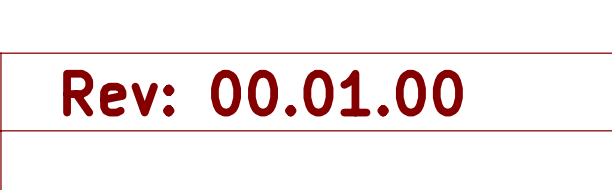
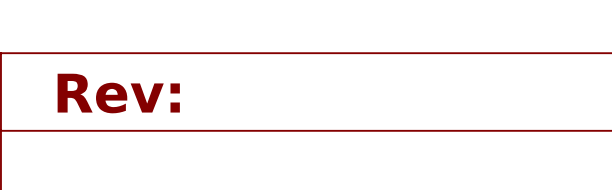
title block: Rev: 00.01.00 (263, 93) -> Rev: (118, 93)

